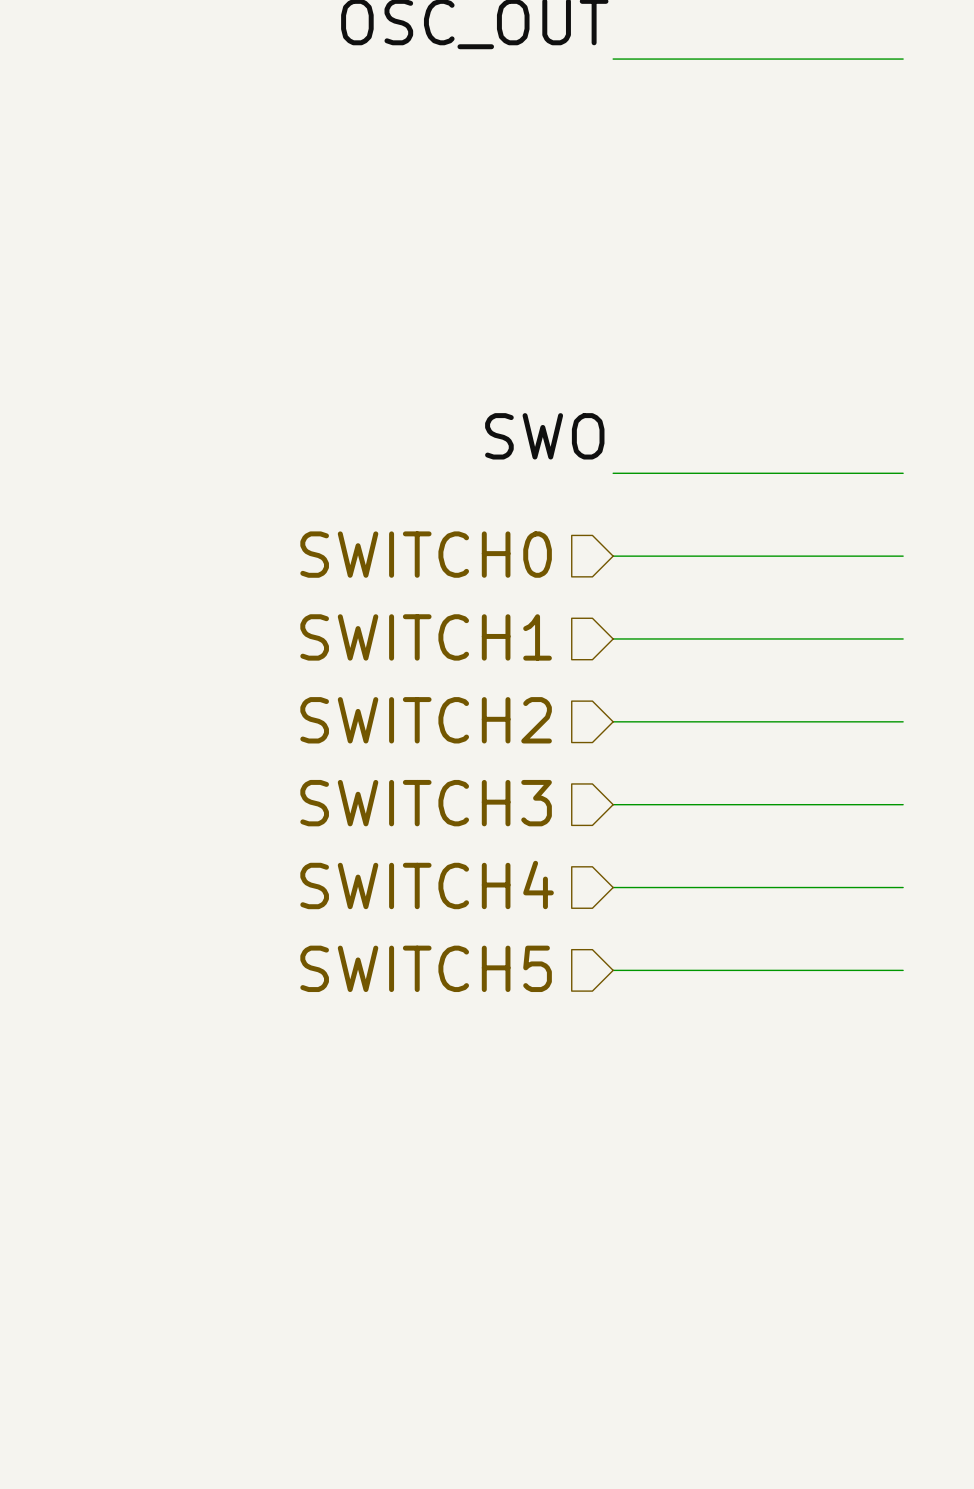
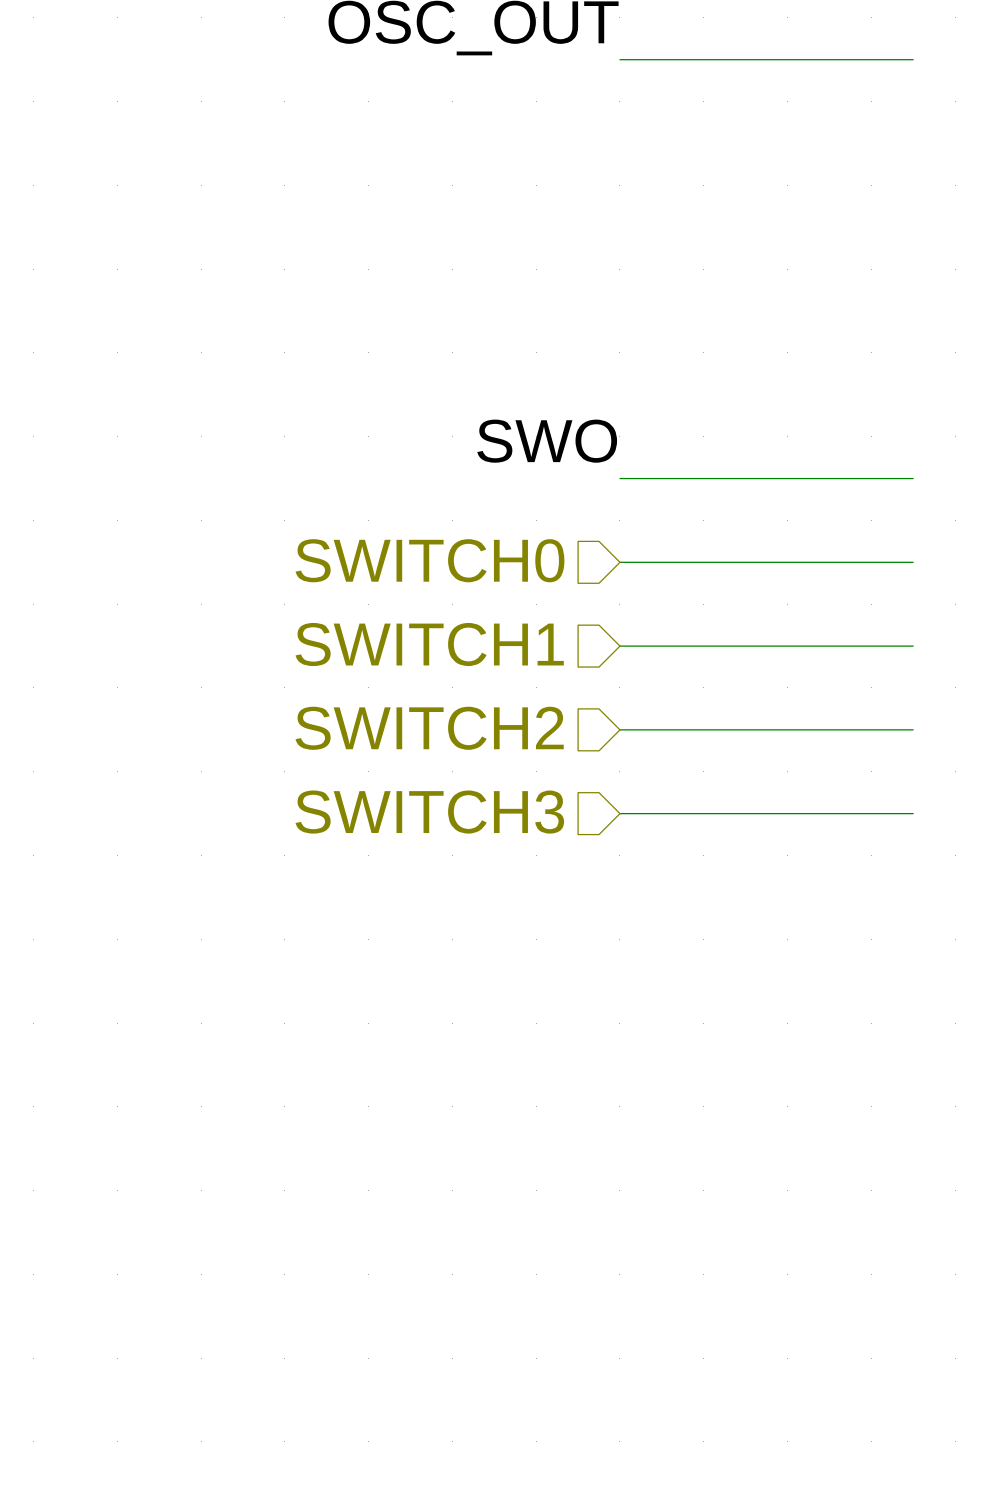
hierarchical label: SWITCH4 (427, 885) -> none
wire: (613, 887) (903, 887) -> none
hierarchical label: SWITCH5 (426, 968) -> none
wire: (613, 970) (903, 970) -> none

